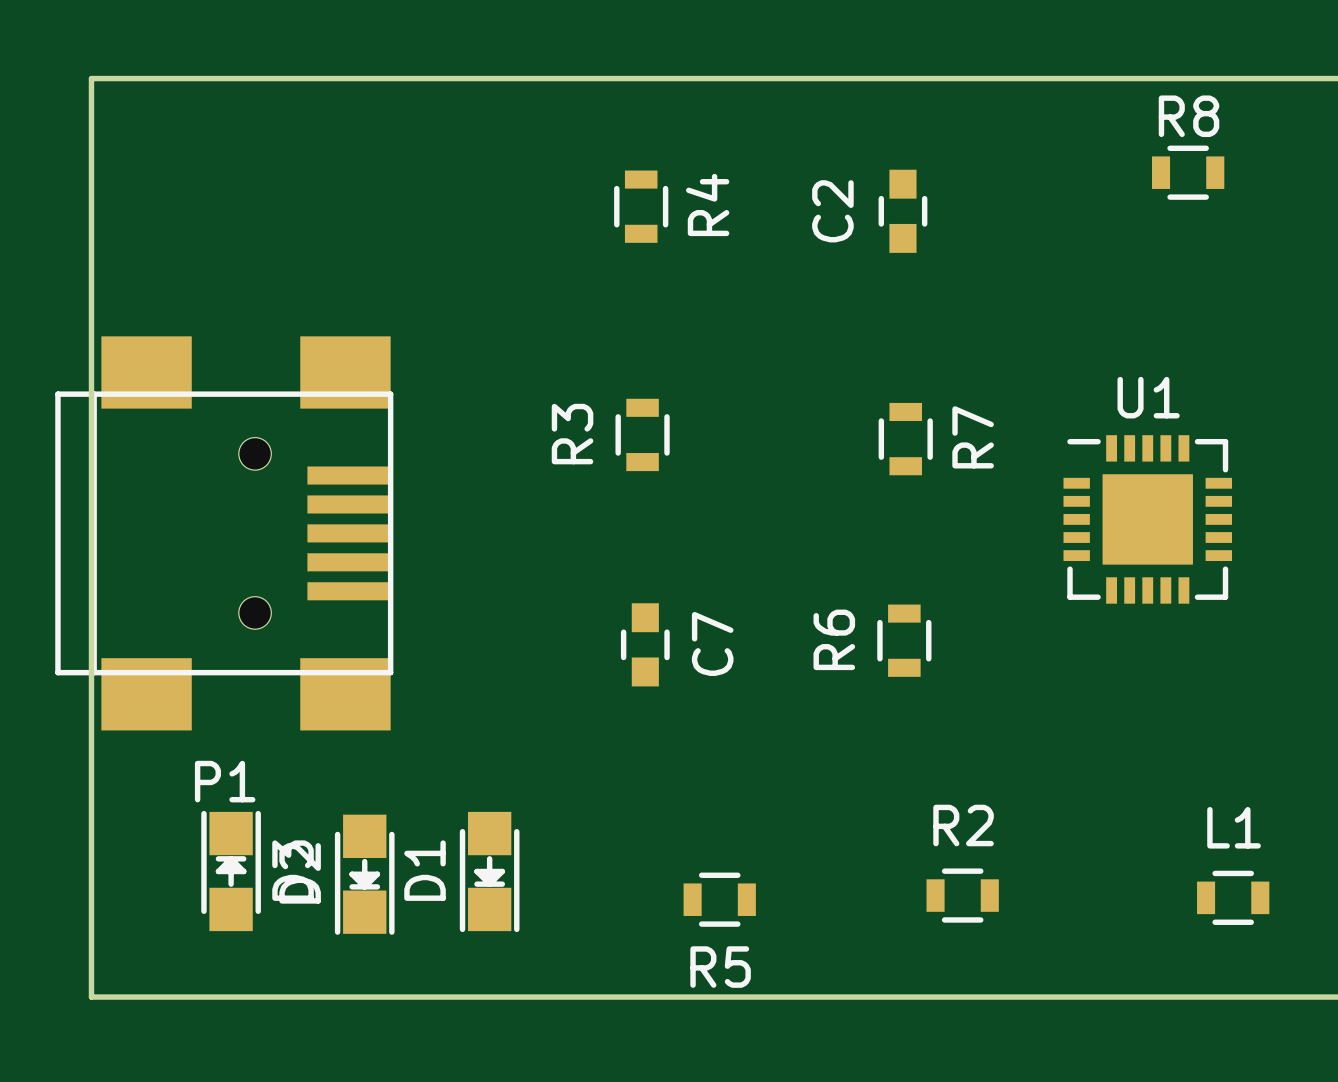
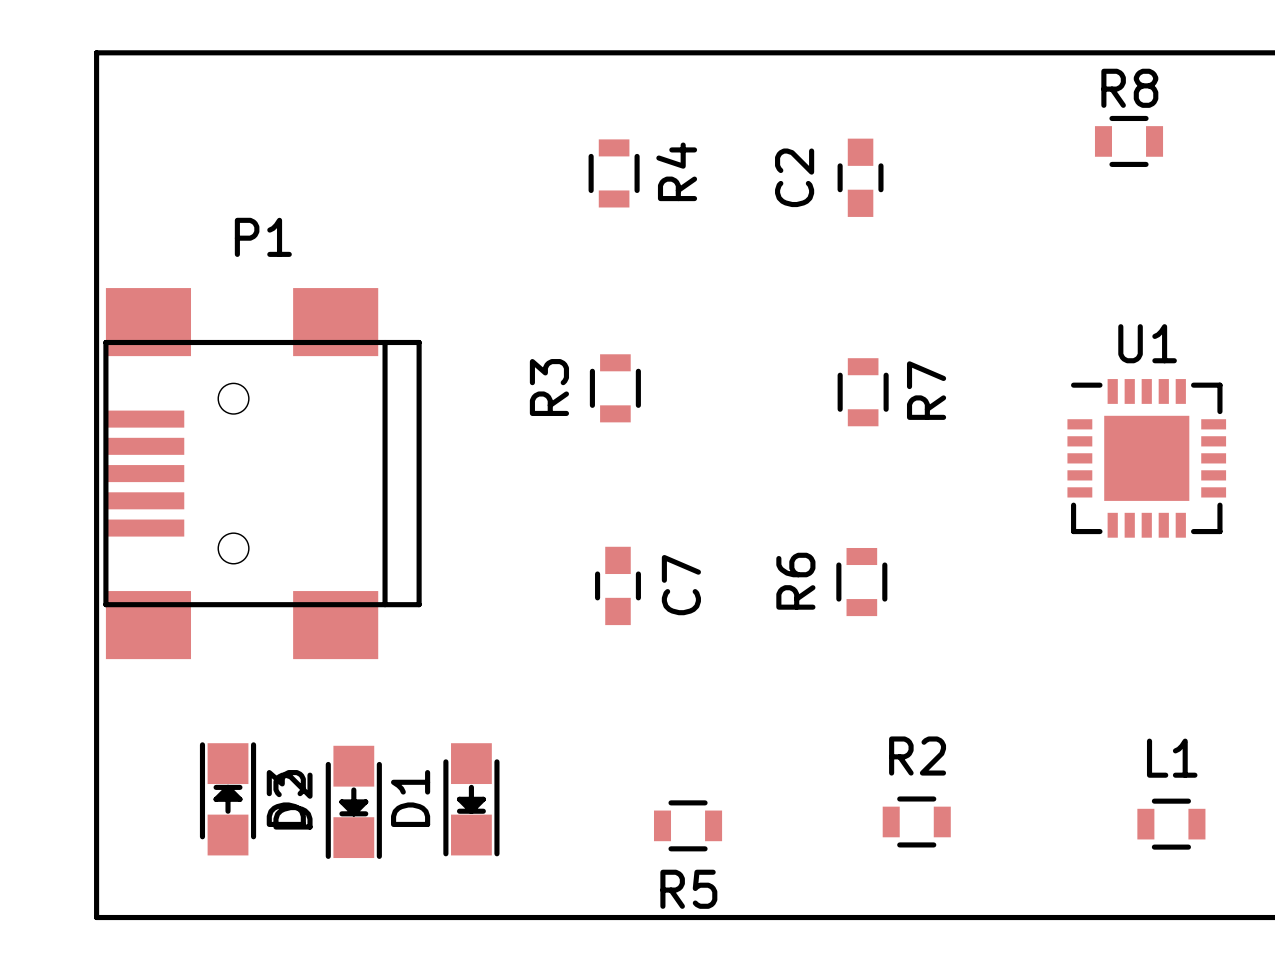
U1 position: (1147, 519) -> (1146, 458)
P1 rotation: 0° (224, 533) -> 180° (262, 473)

